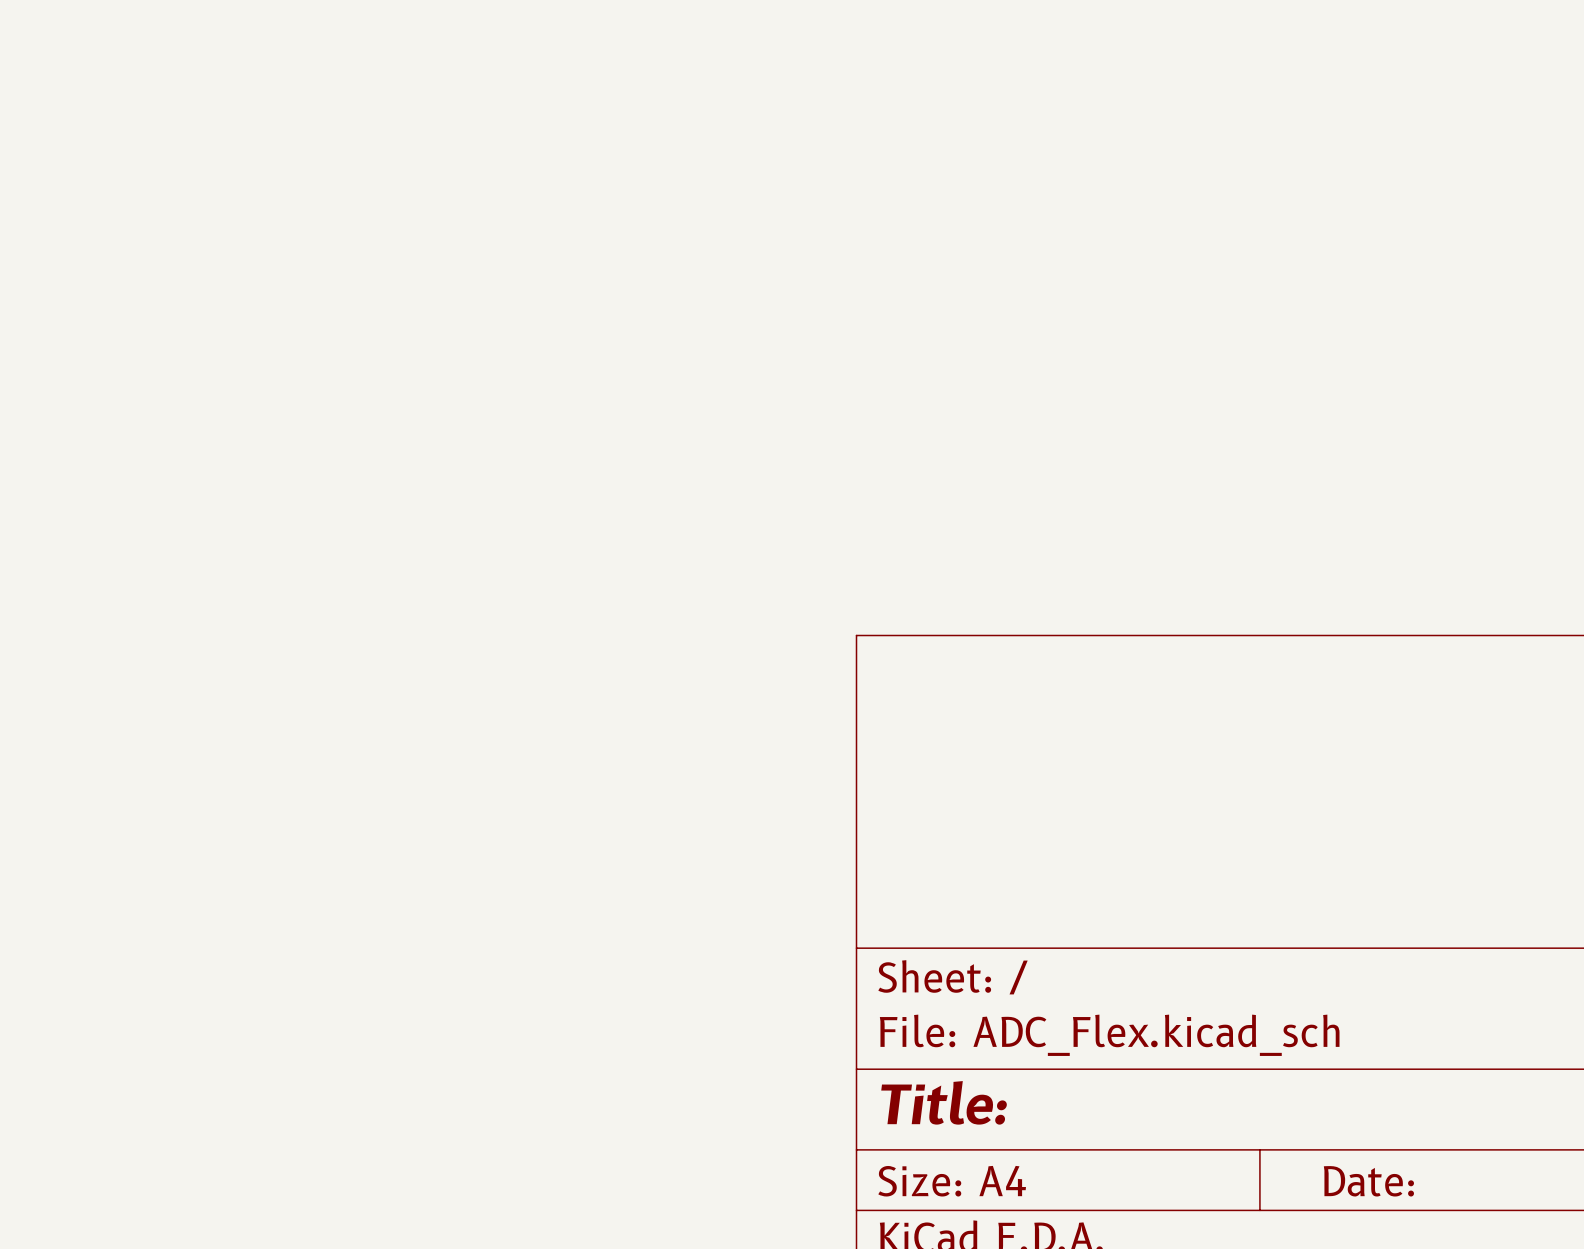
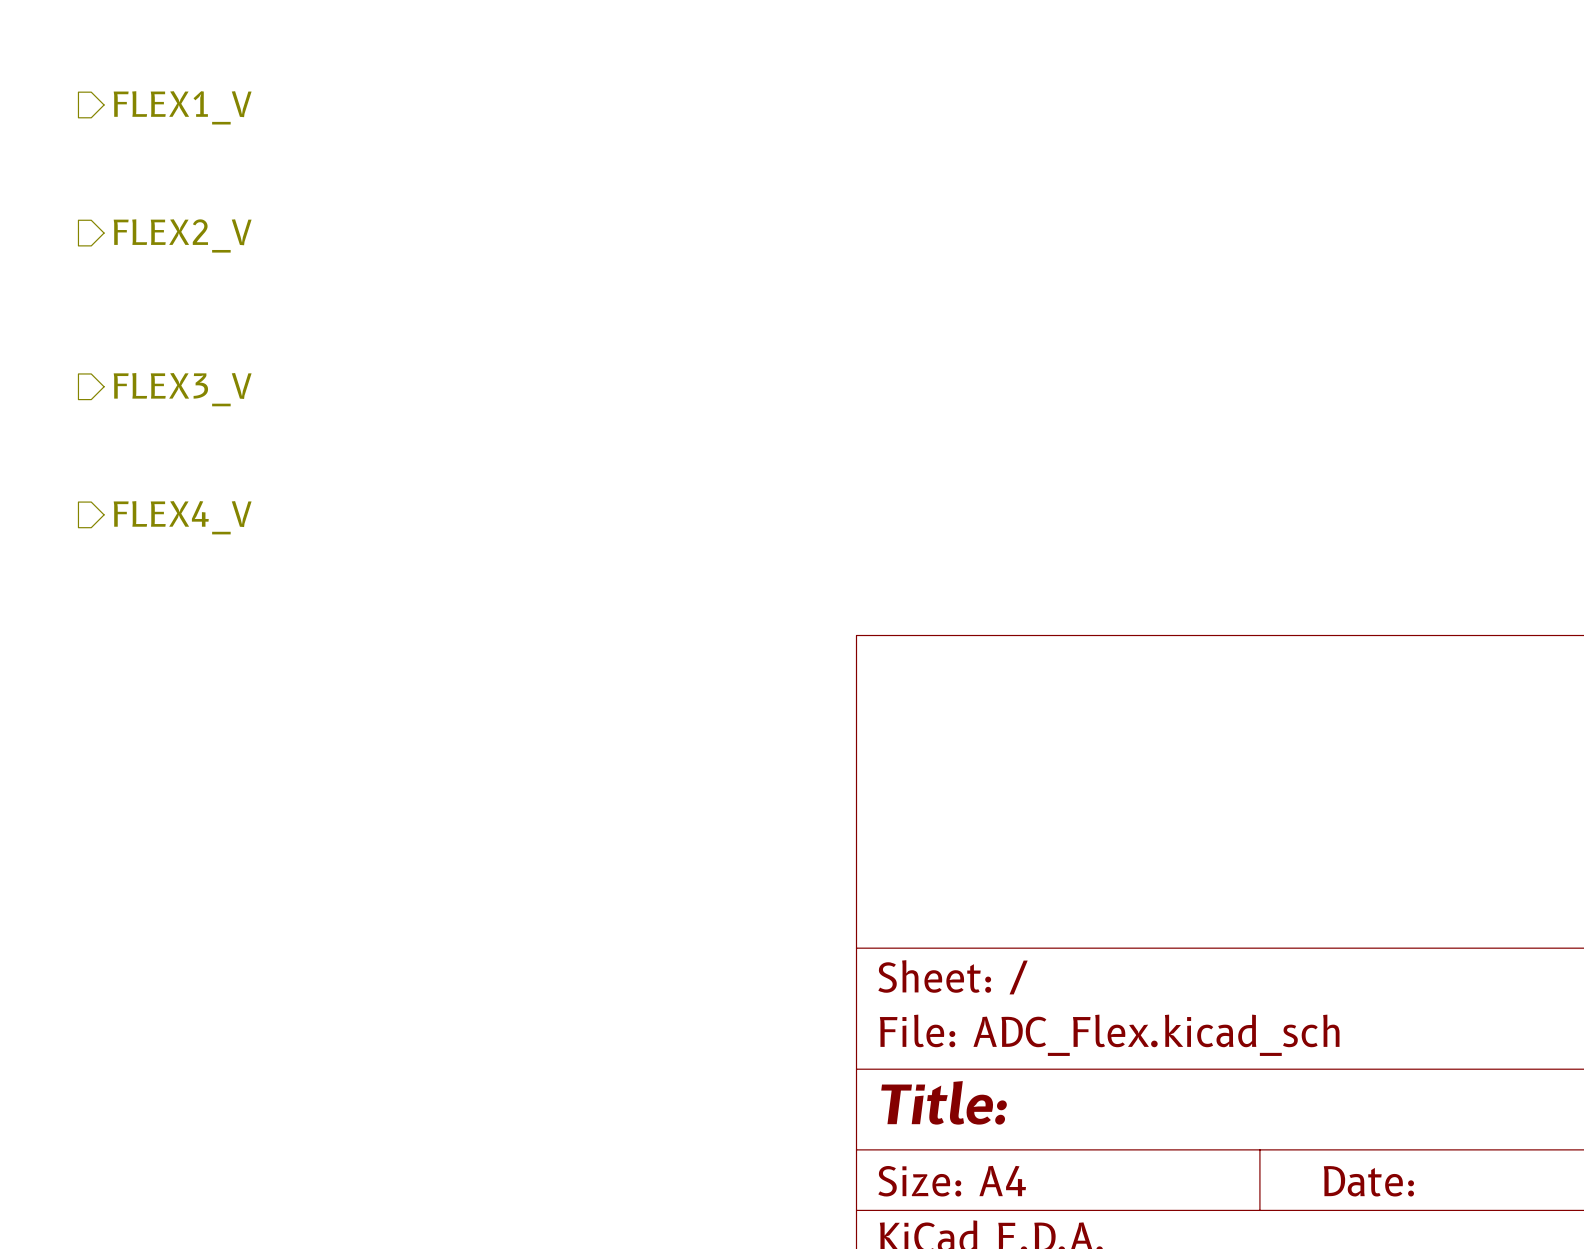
hierarchical label: none -> FLEX1_V (182, 107)
hierarchical label: none -> FLEX2_V (182, 235)
hierarchical label: none -> FLEX3_V (182, 389)
hierarchical label: none -> FLEX4_V (182, 517)

